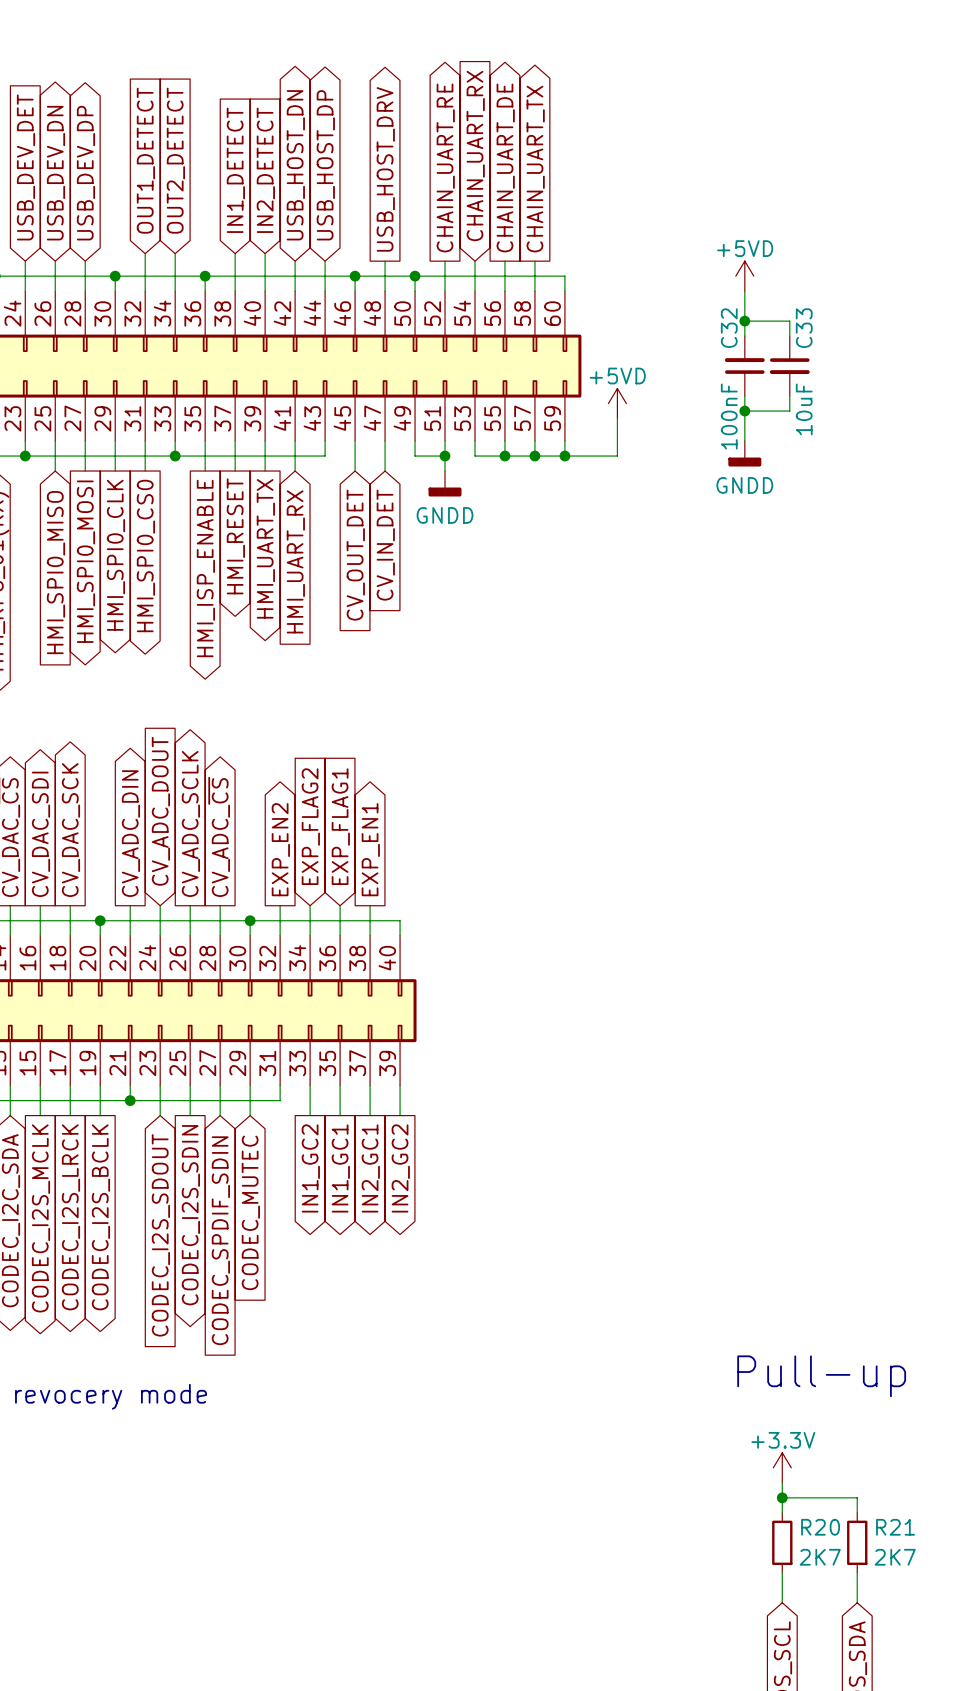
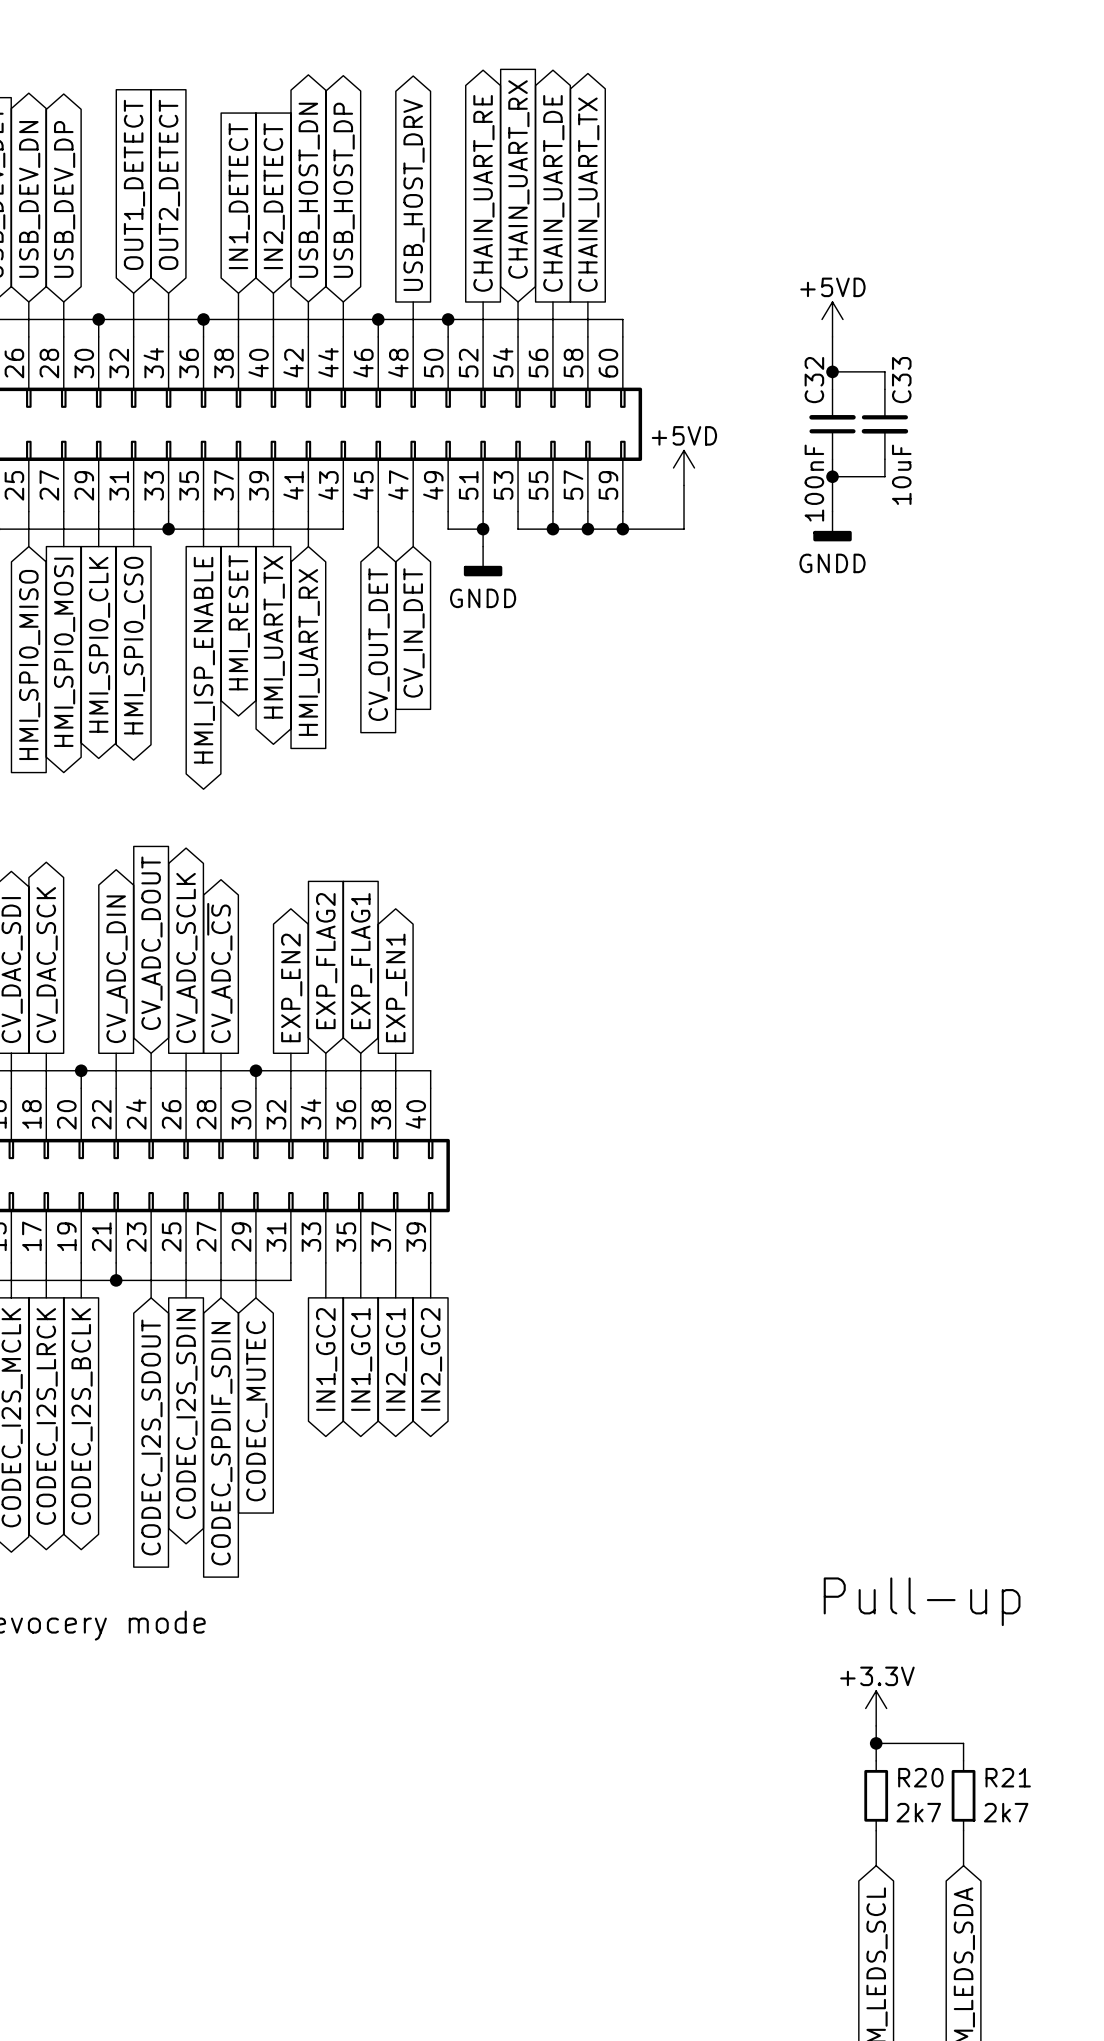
R20 value: 2K7 (820, 1557) -> 2k7 (918, 1812)
R21 value: 2K7 (895, 1557) -> 2k7 (1006, 1812)

